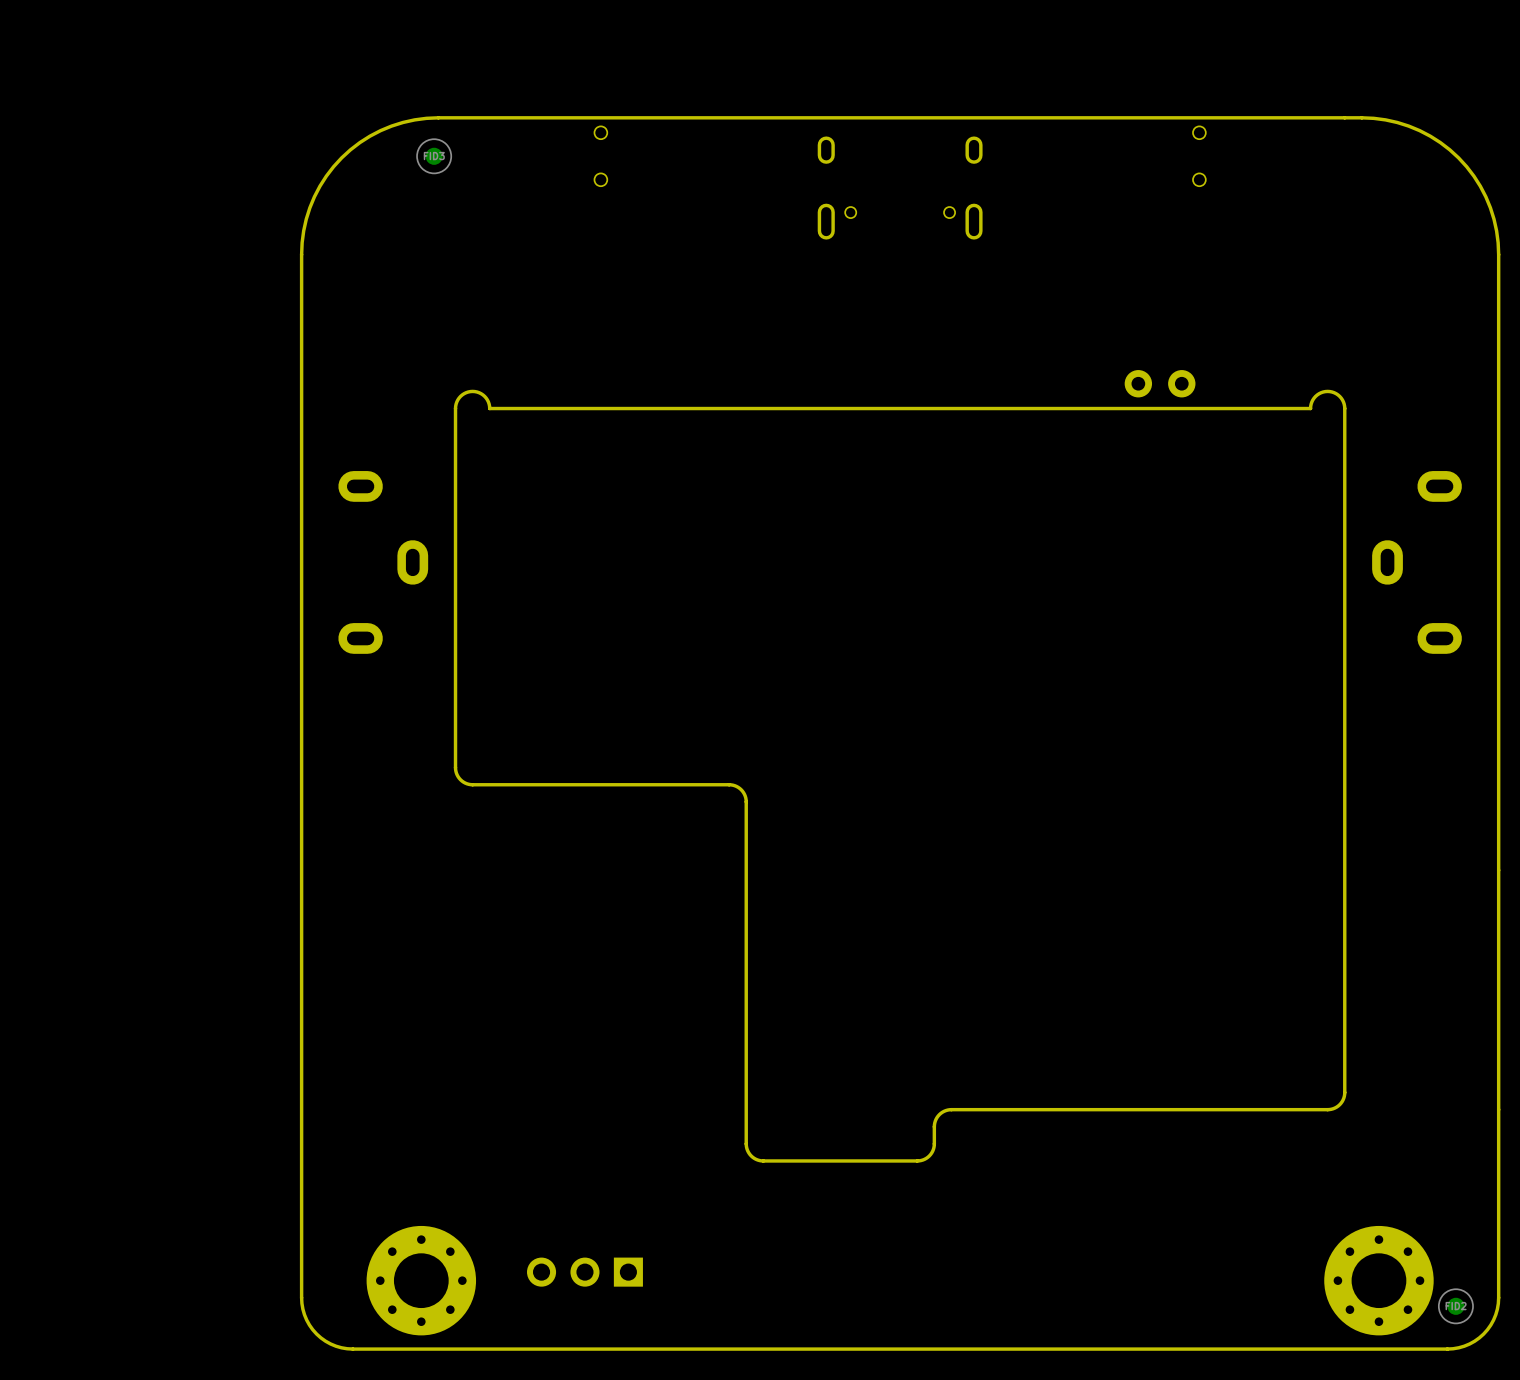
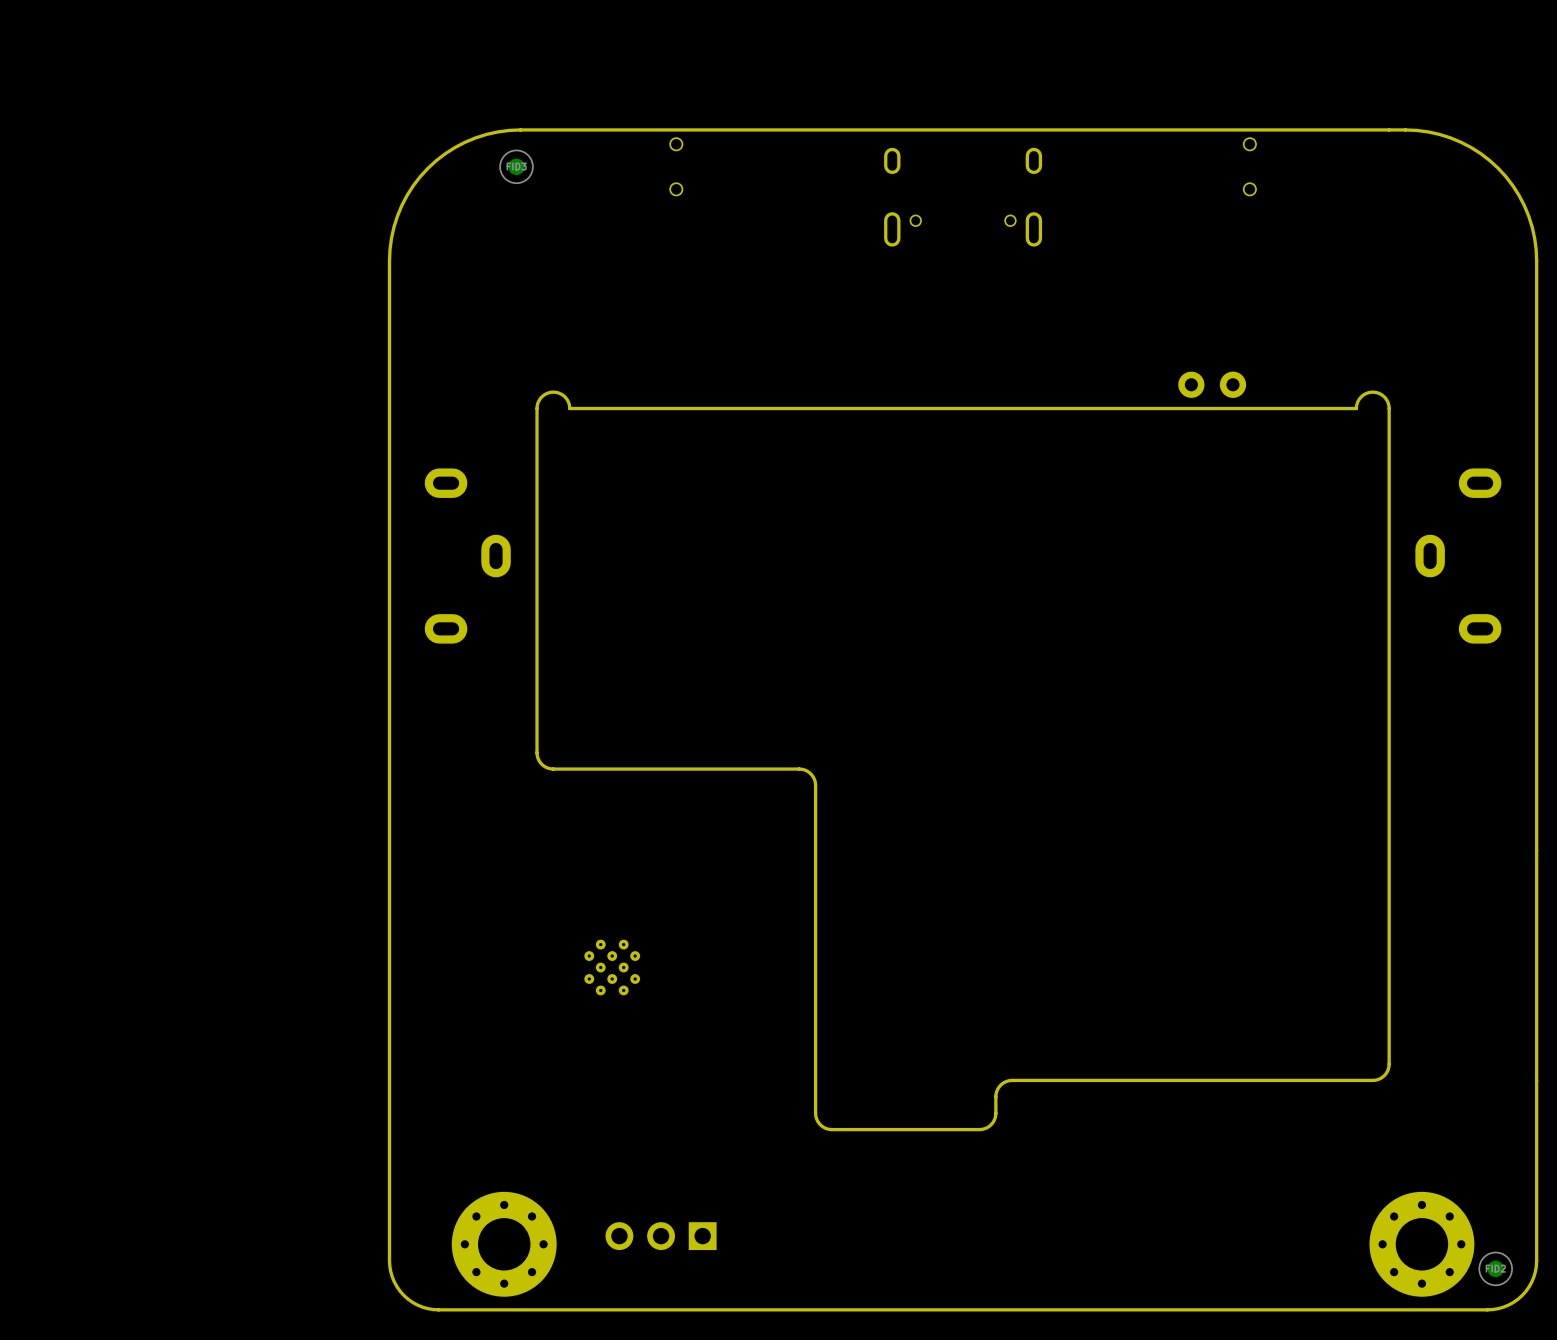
part: none -> (612, 967)

